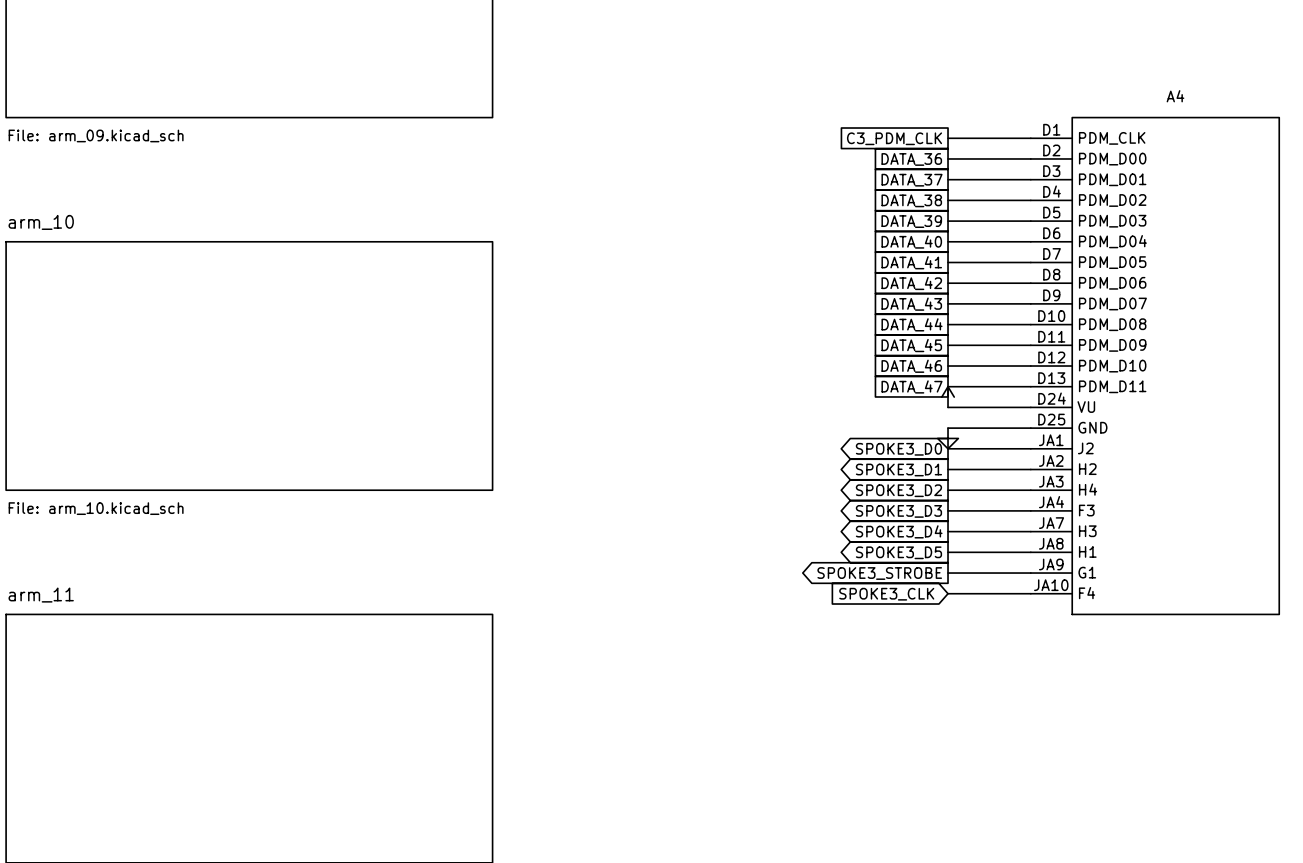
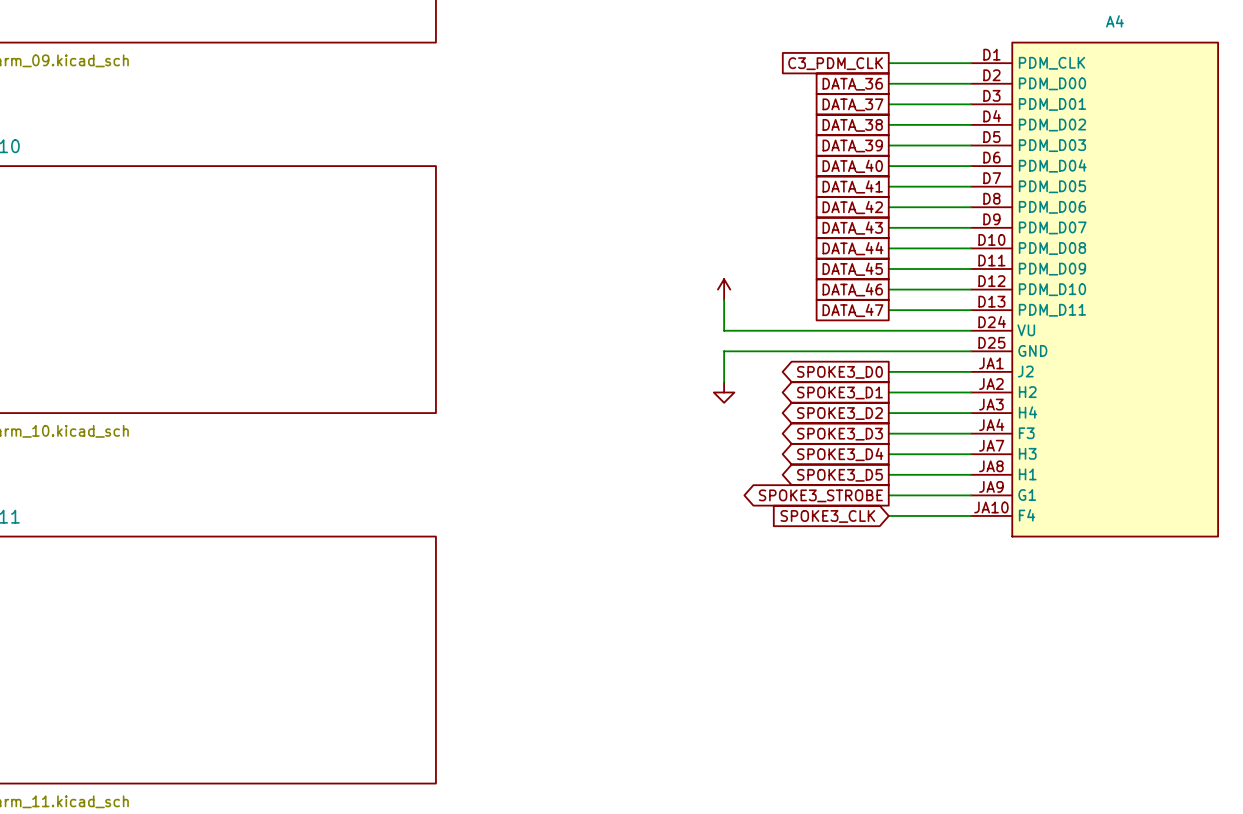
wire: none -> (724, 299) (724, 330) (888, 330)
power symbol position: (948, 397) -> (724, 289)
wire: none -> (888, 351) (724, 351) (724, 382)
power symbol position: (948, 438) -> (724, 392)

